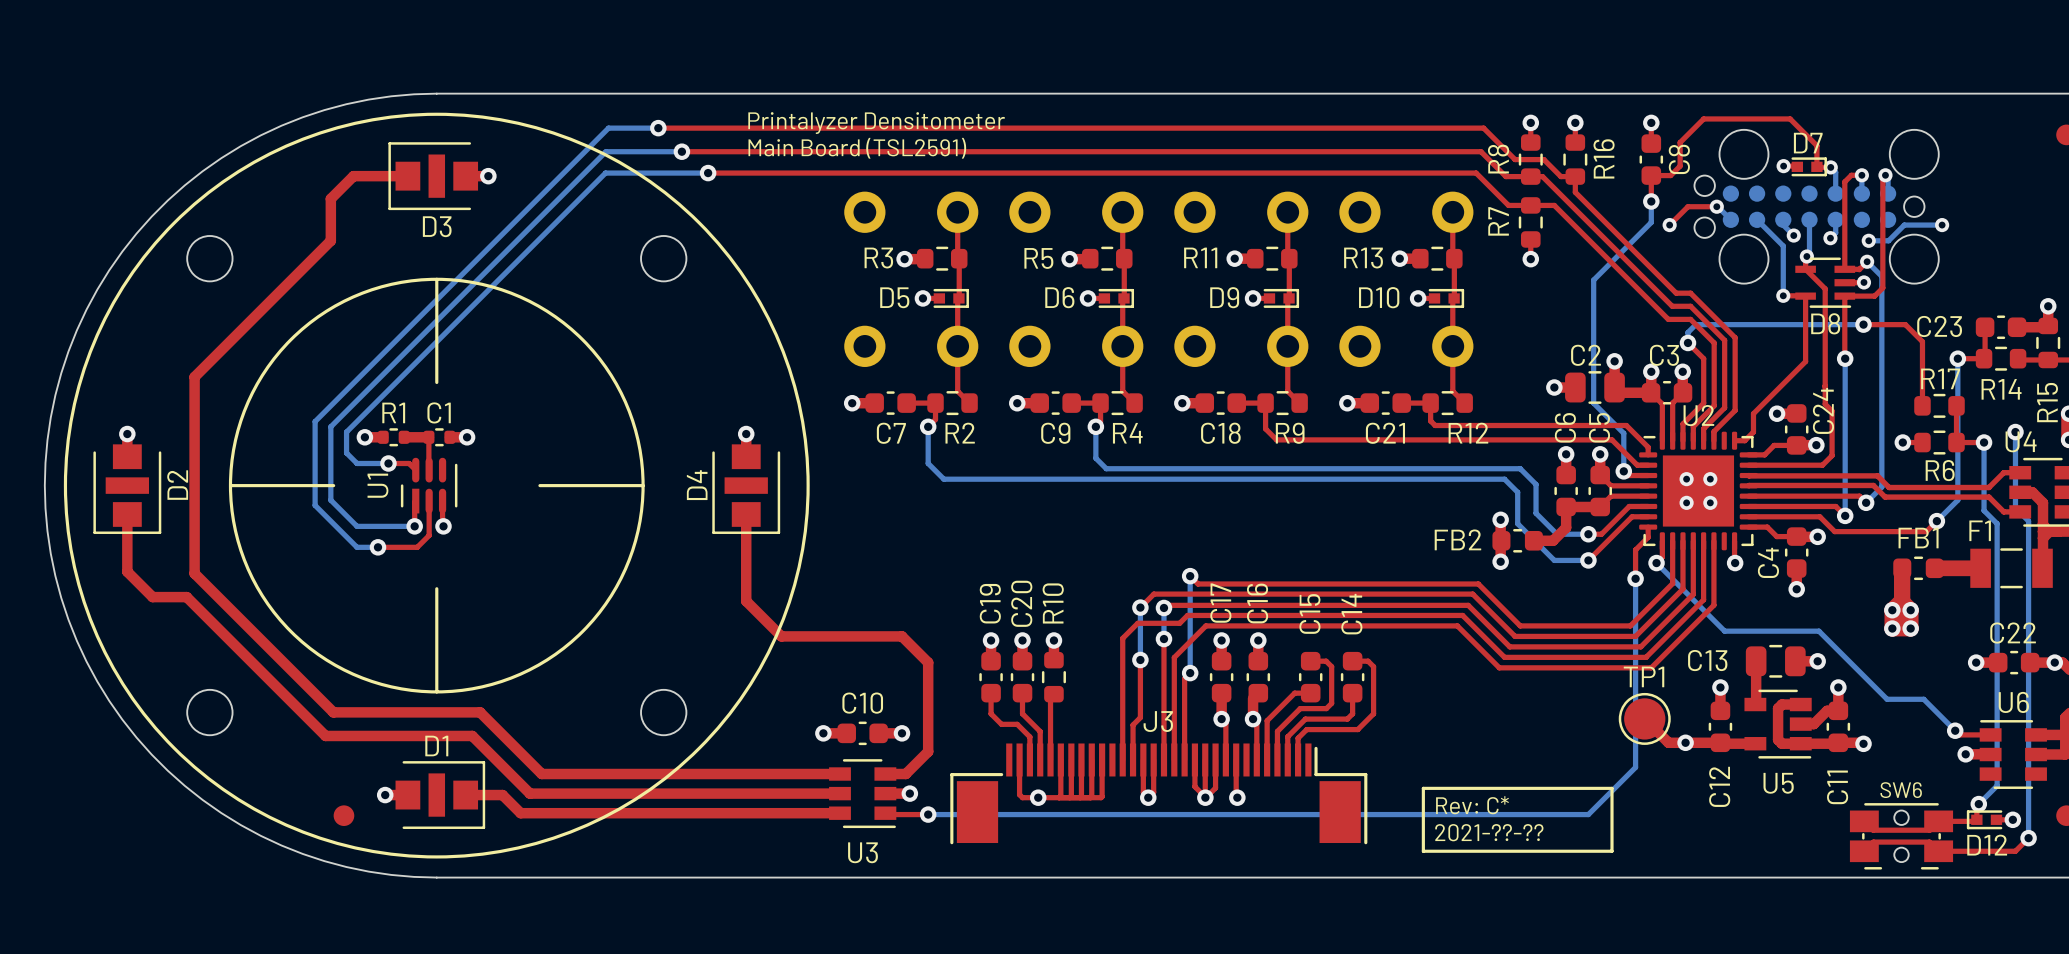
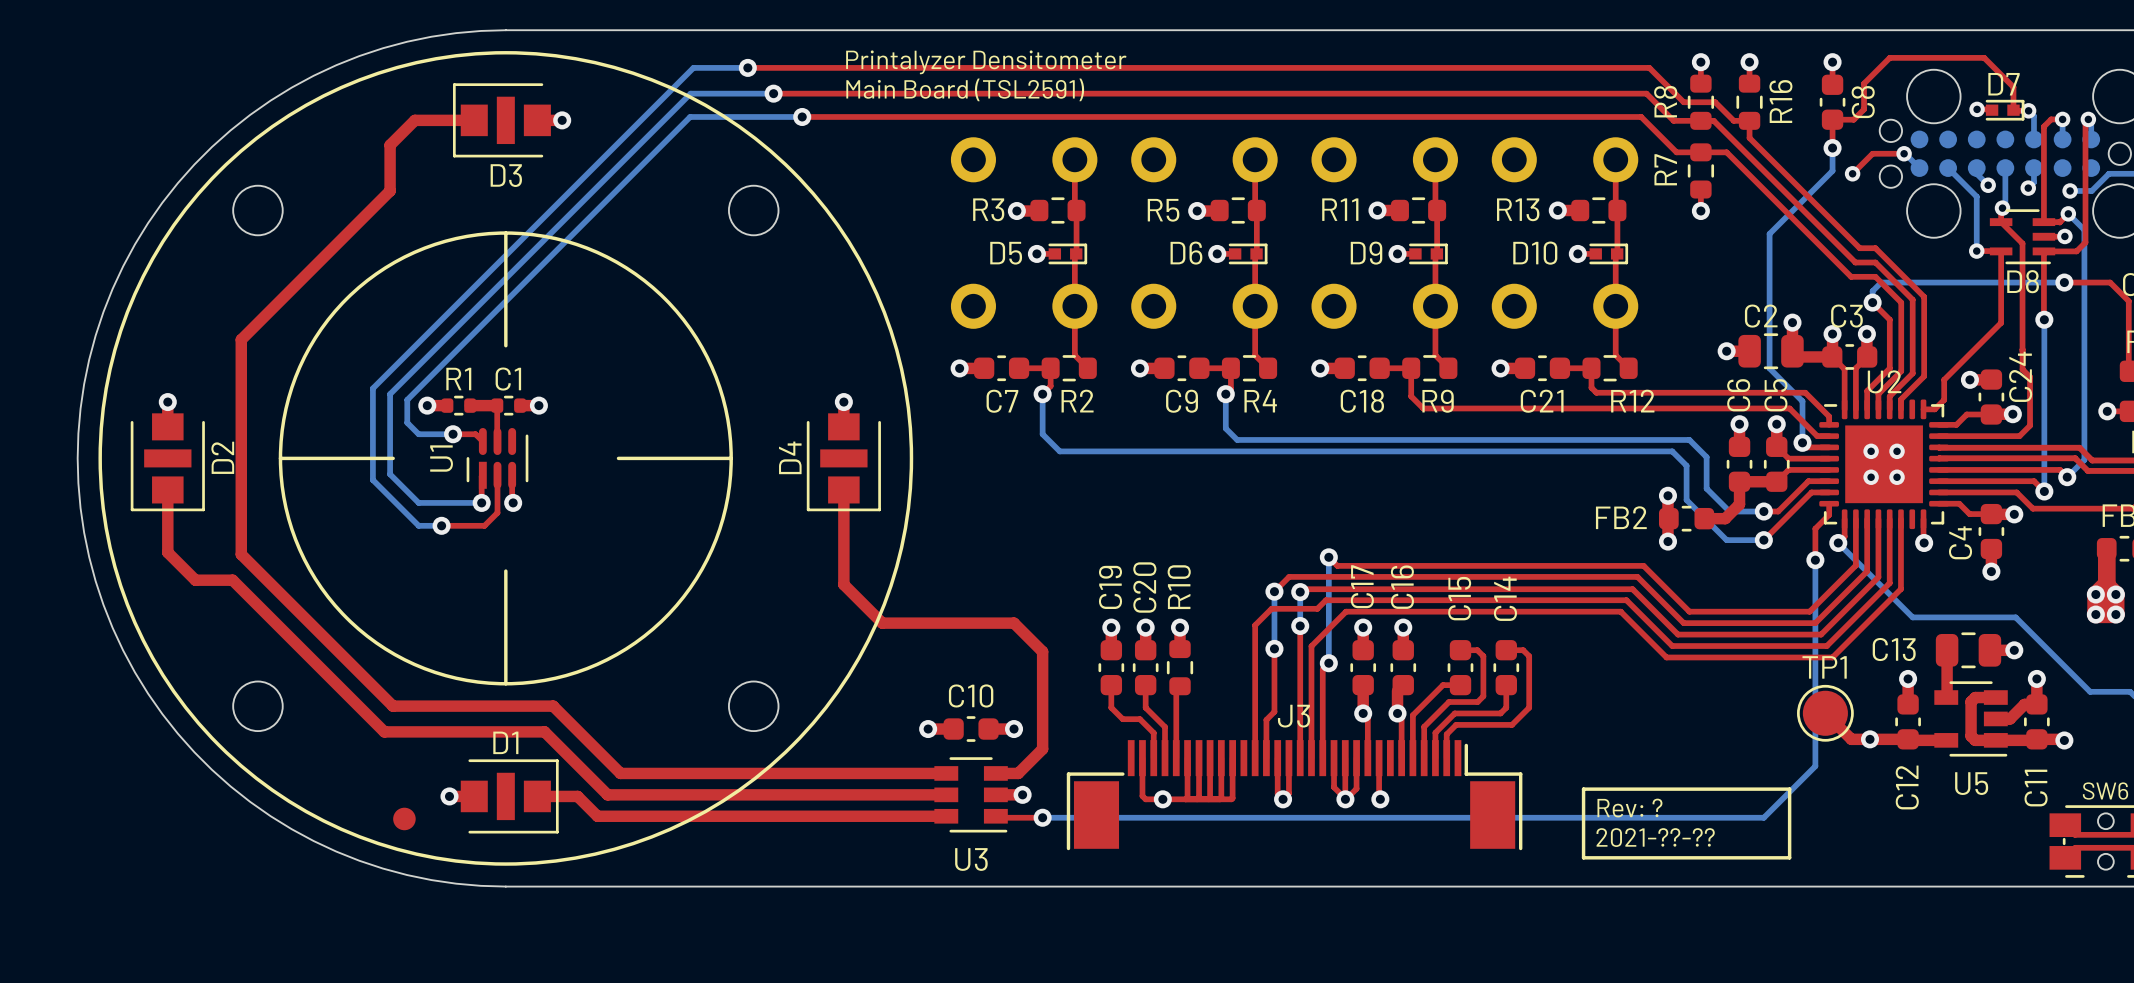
text: Rev: C* (1472, 805) -> Rev: ? (1629, 808)

